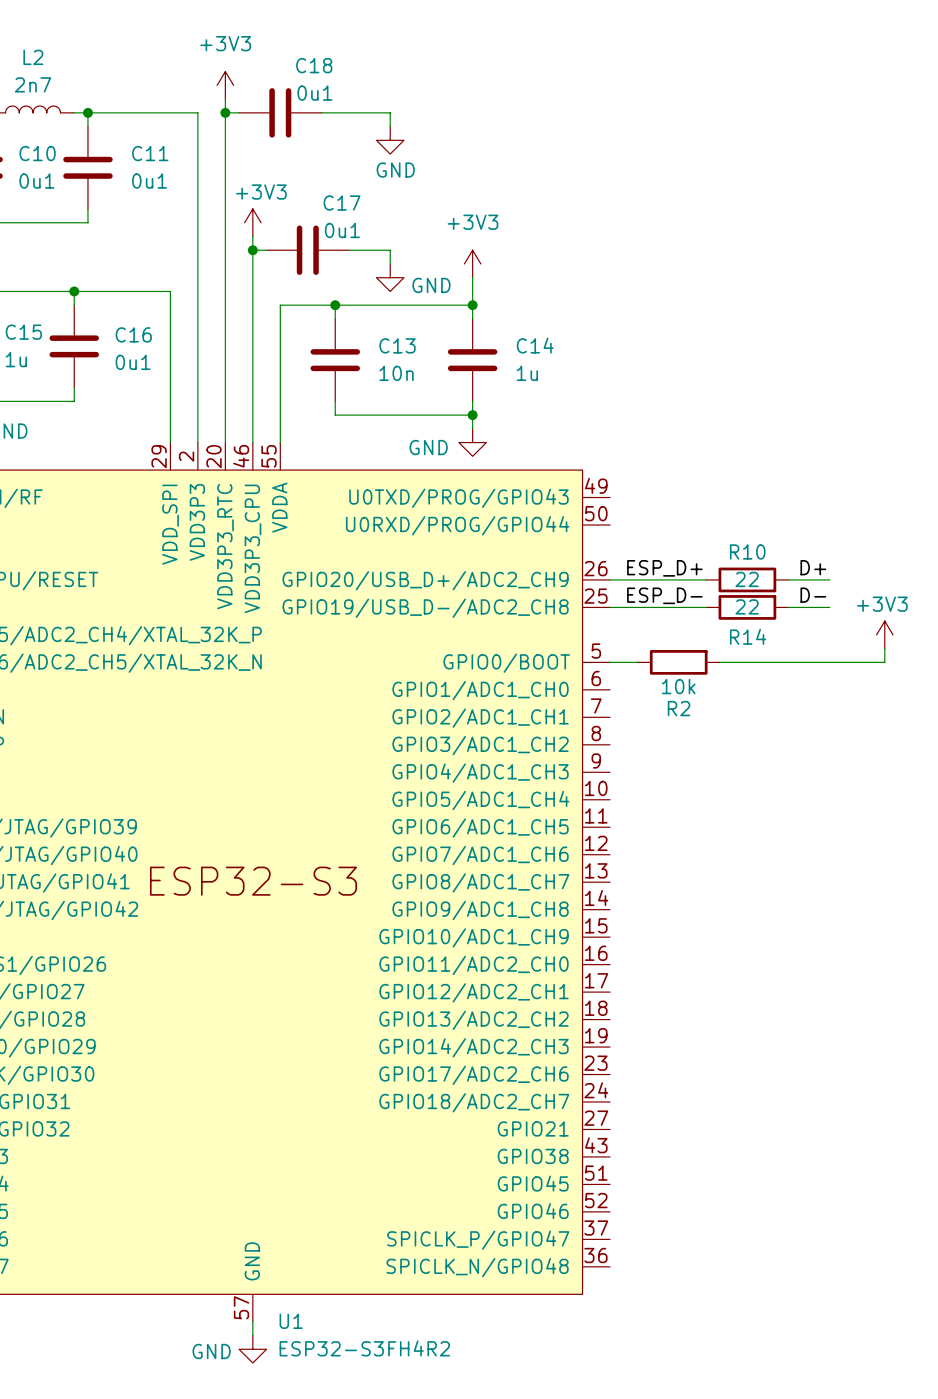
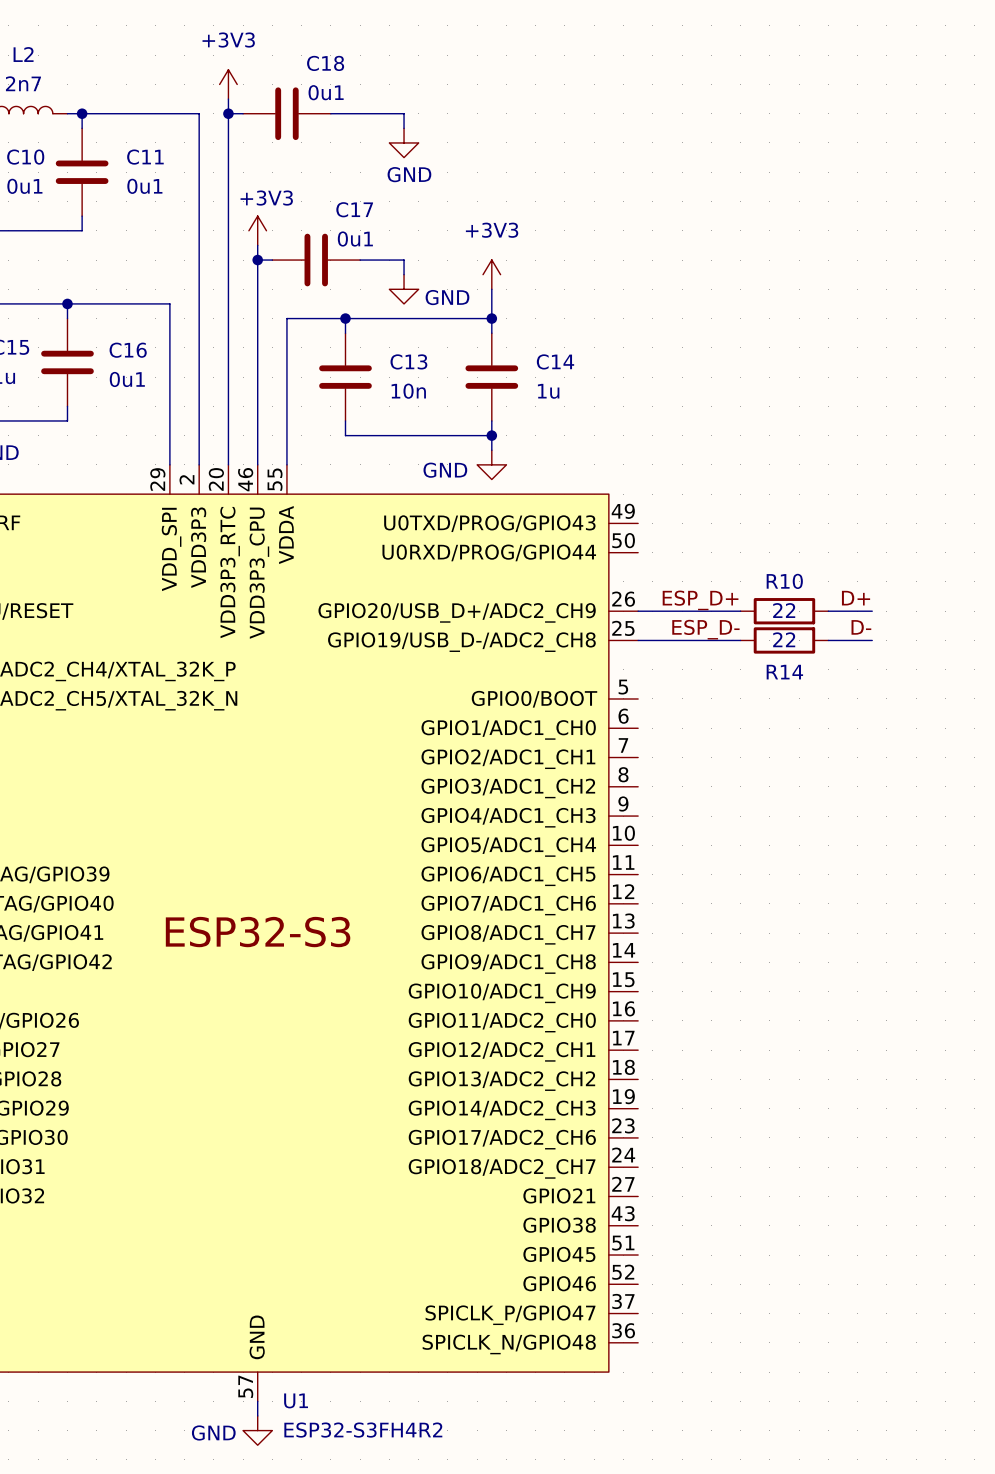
power symbol: +3V3 (884, 634) -> none
wire: (884, 648) (884, 662) (719, 662) -> none
wire: (610, 662) (637, 662) -> none
R2: 10k (678, 662) -> none

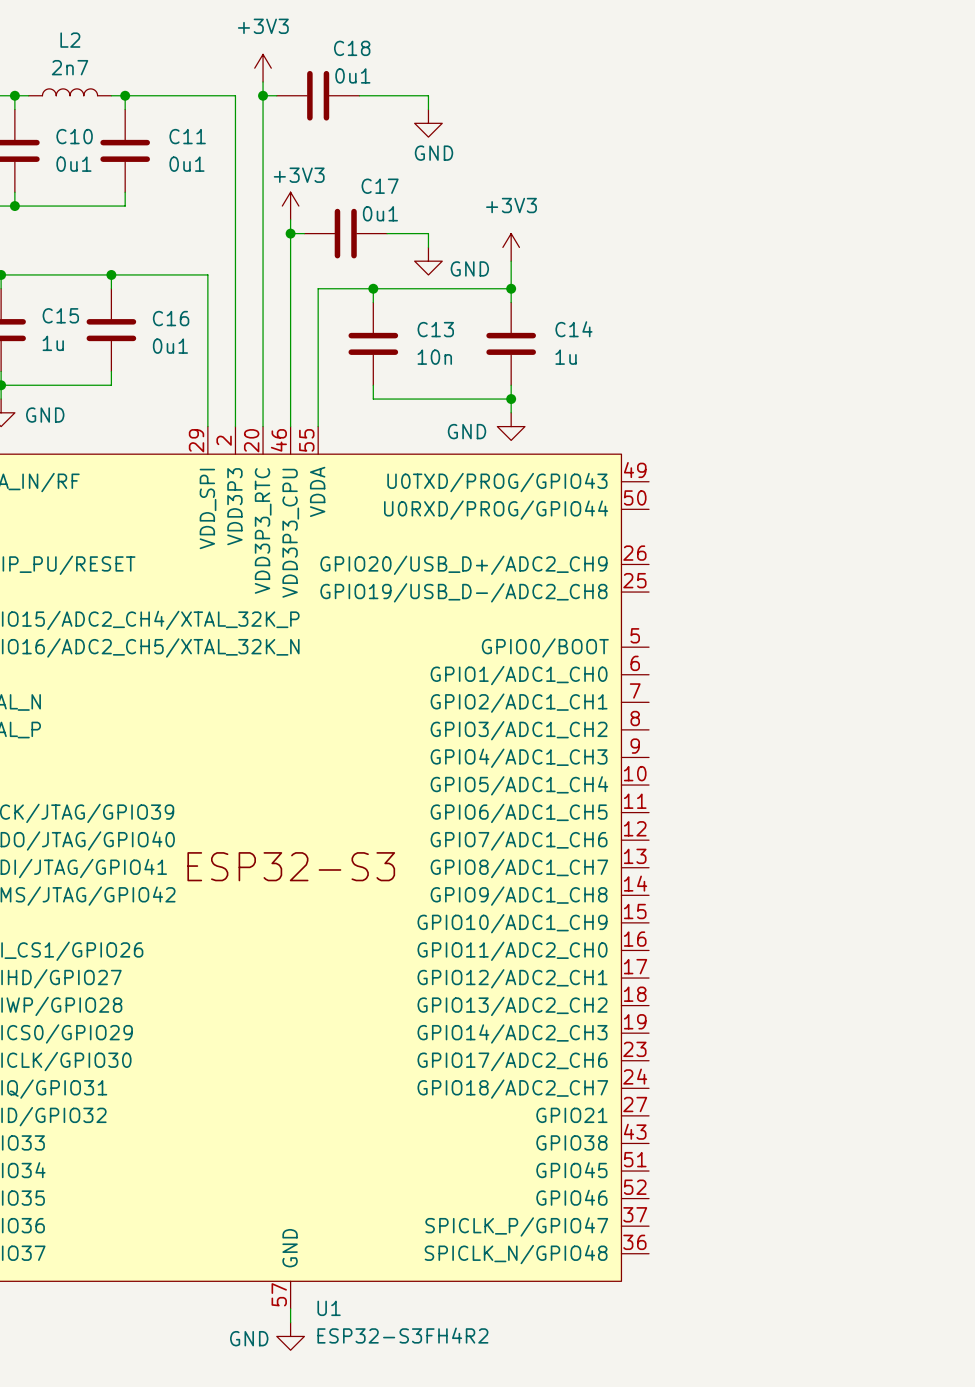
label: D+ (856, 598) -> none
label: ESP_D+ (700, 600) -> none
wire: (638, 611) (740, 611) -> none
R10: 22 (784, 611) -> none
wire: (828, 611) (872, 611) -> none
label: D- (861, 627) -> none
label: ESP_D- (705, 629) -> none
wire: (638, 640) (740, 640) -> none
R14: 22 (784, 640) -> none
wire: (828, 640) (872, 640) -> none

